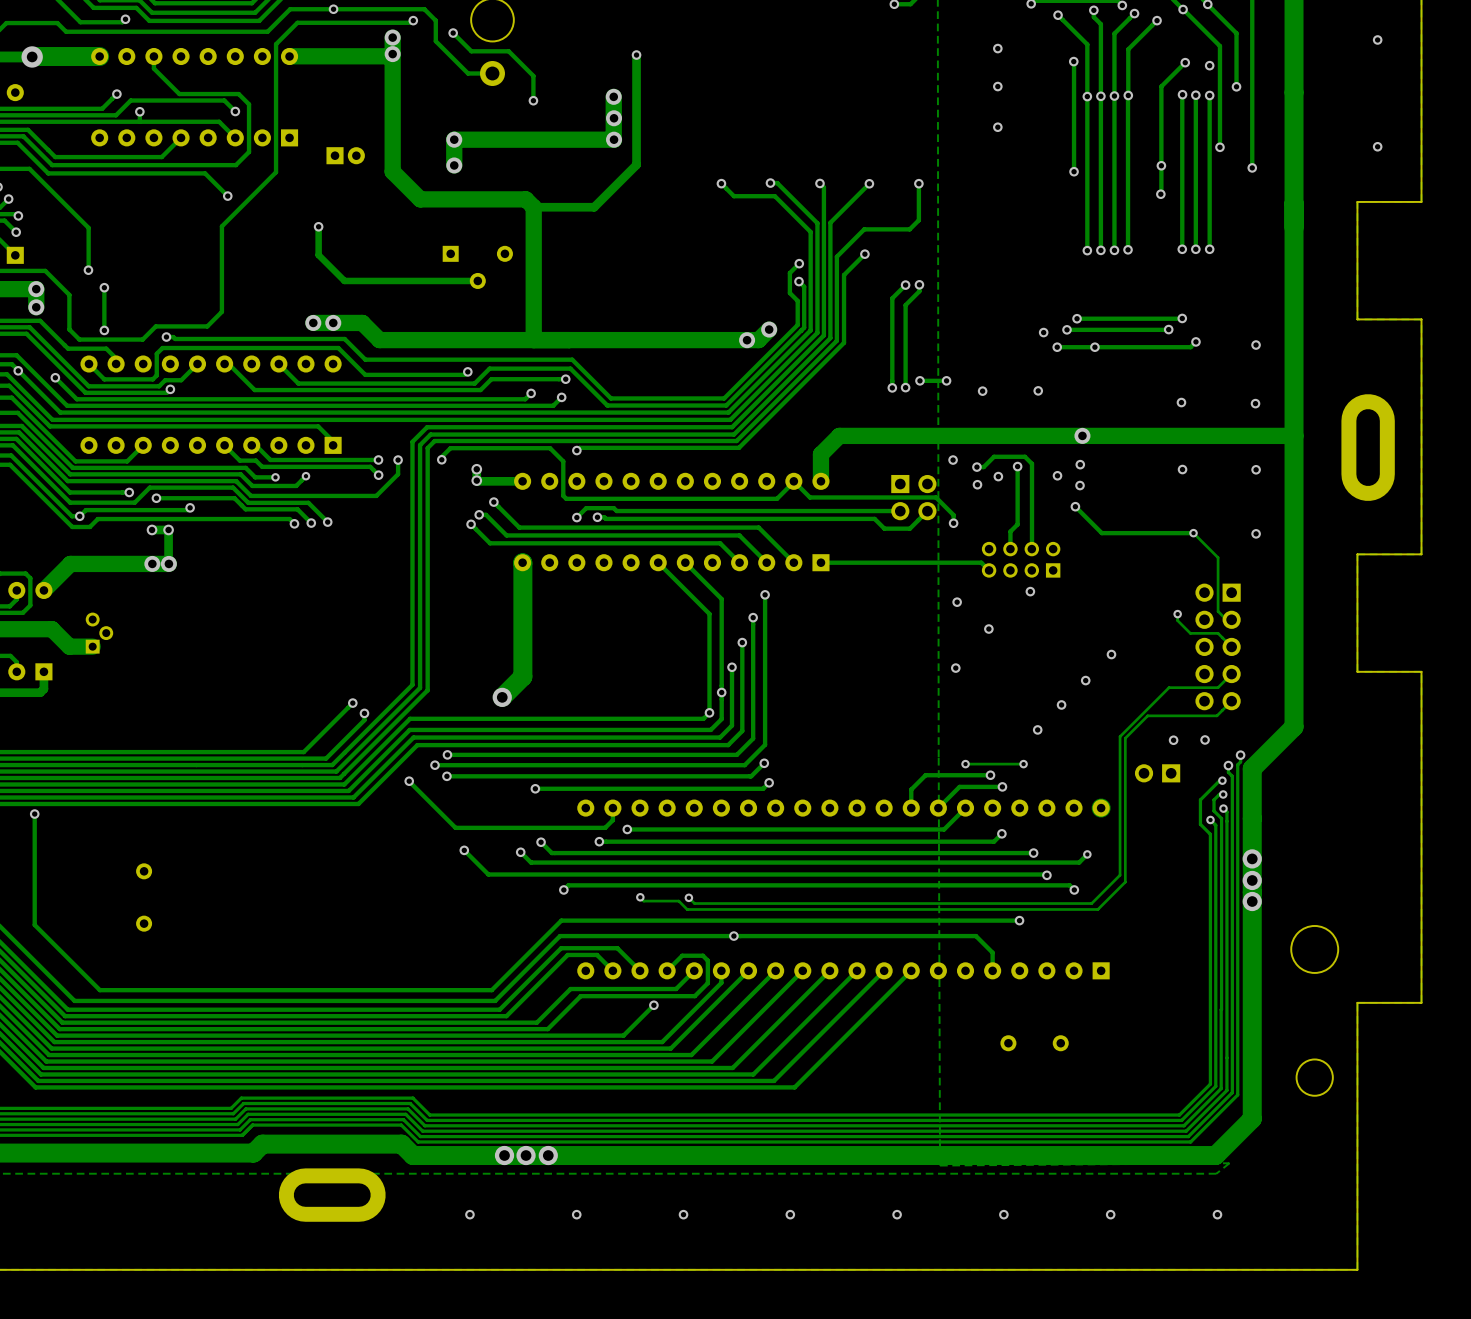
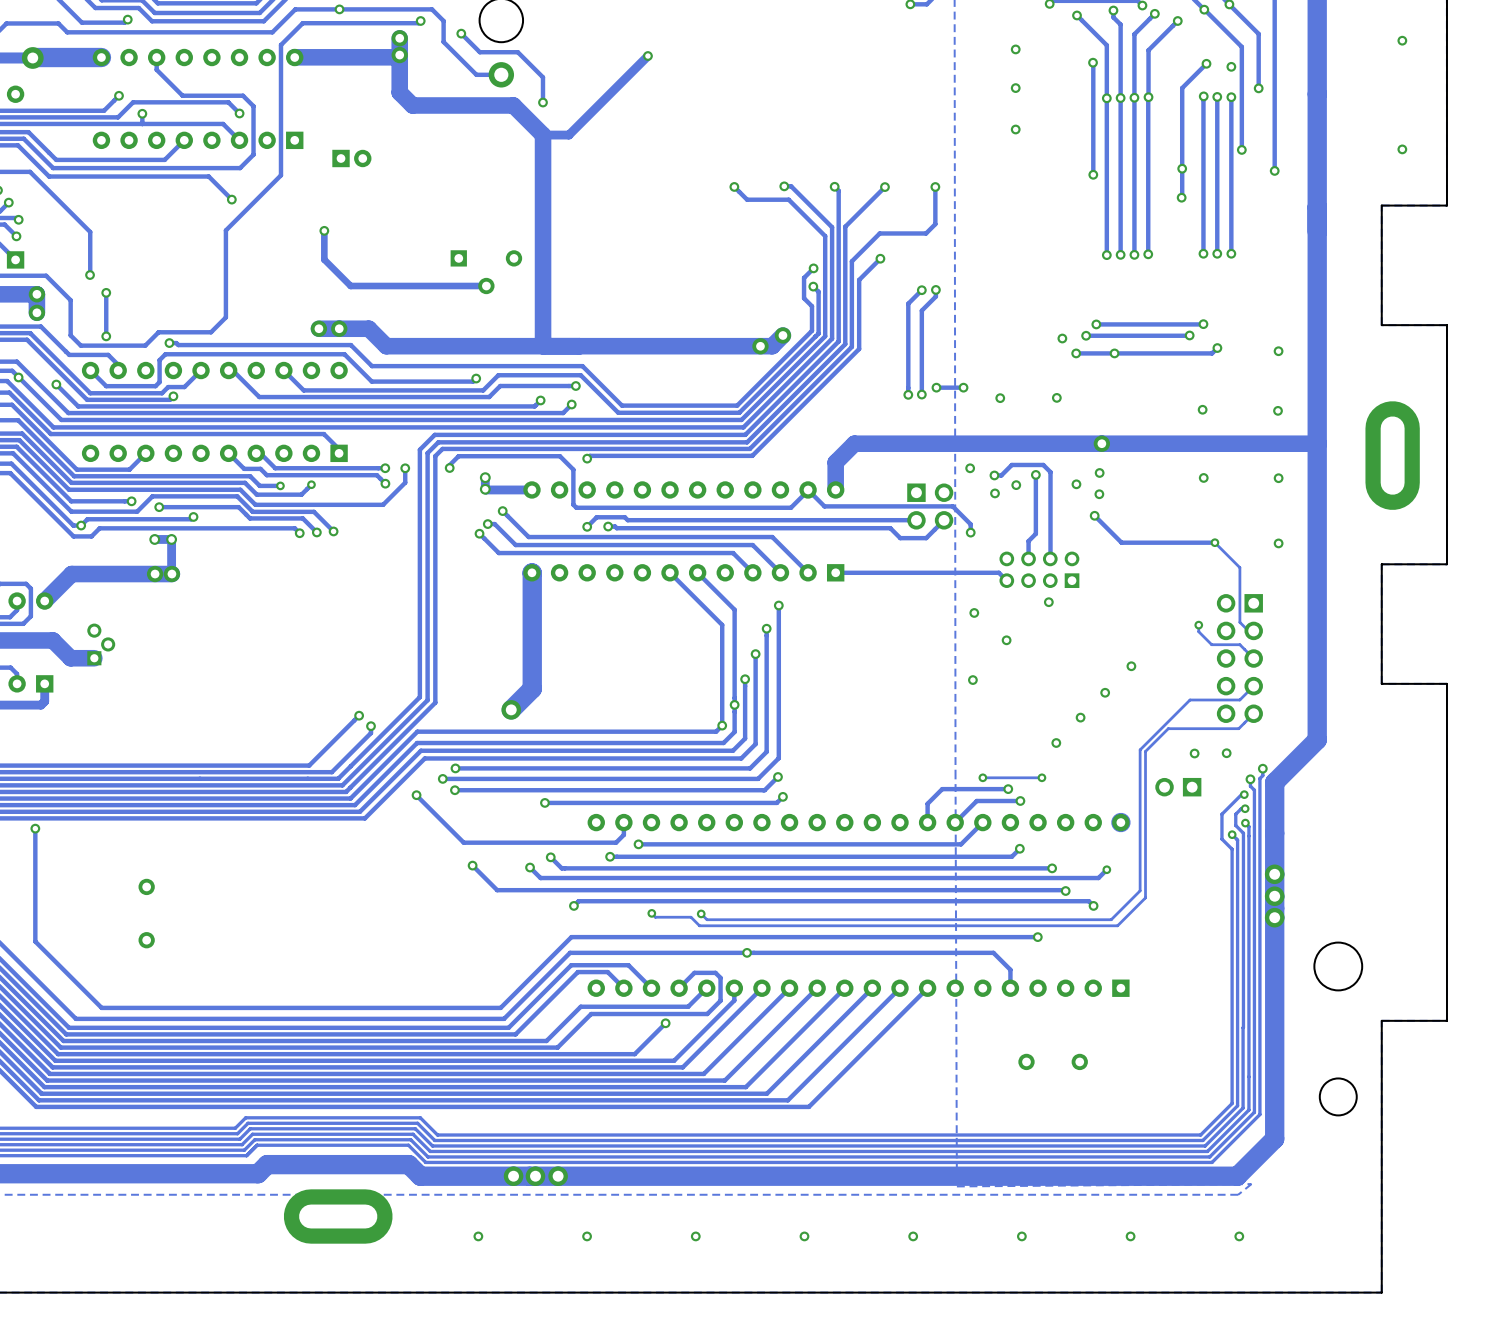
track: (636, 55) (636, 164) (594, 207) (533, 207) -> (647, 56) (568, 135) (543, 135)
track: (392, 90) (392, 171) (420, 199) (525, 199) (533, 207) -> (399, 92) (412, 105) (513, 105) (543, 135)
track: (613, 96) (614, 139) (454, 139) (454, 165) -> none
via: (613, 96) -> none
via: (614, 118) -> none
via: (454, 139) -> none
via: (614, 139) -> none
via: (454, 165) -> none
track: (533, 207) (533, 340) -> (543, 135) (543, 346)

